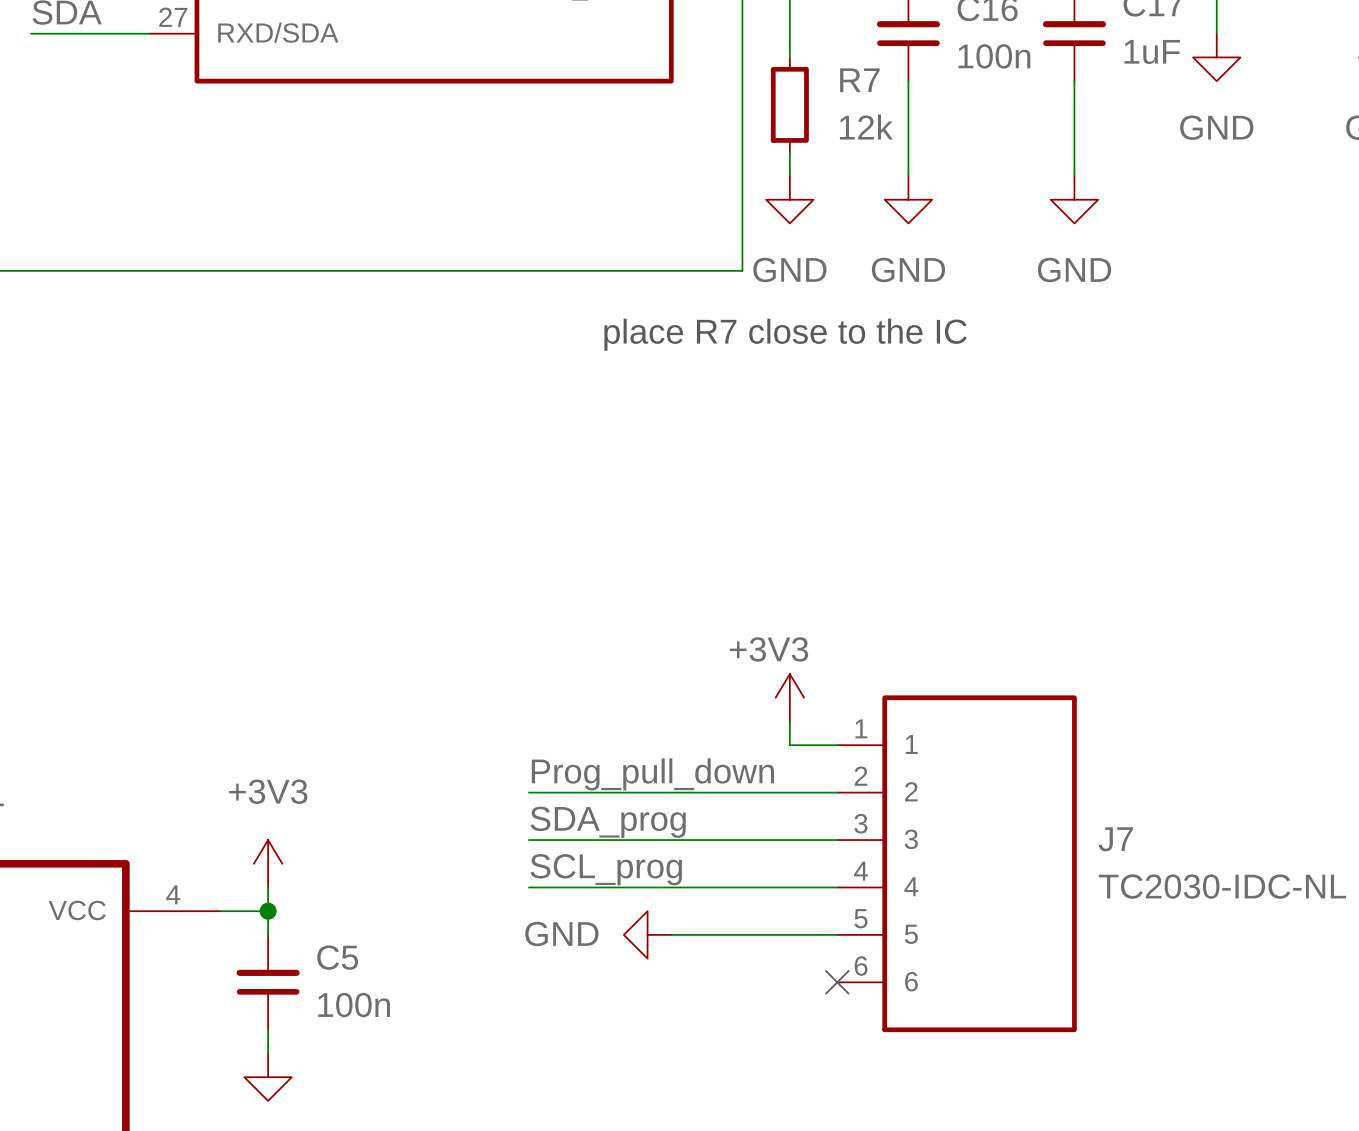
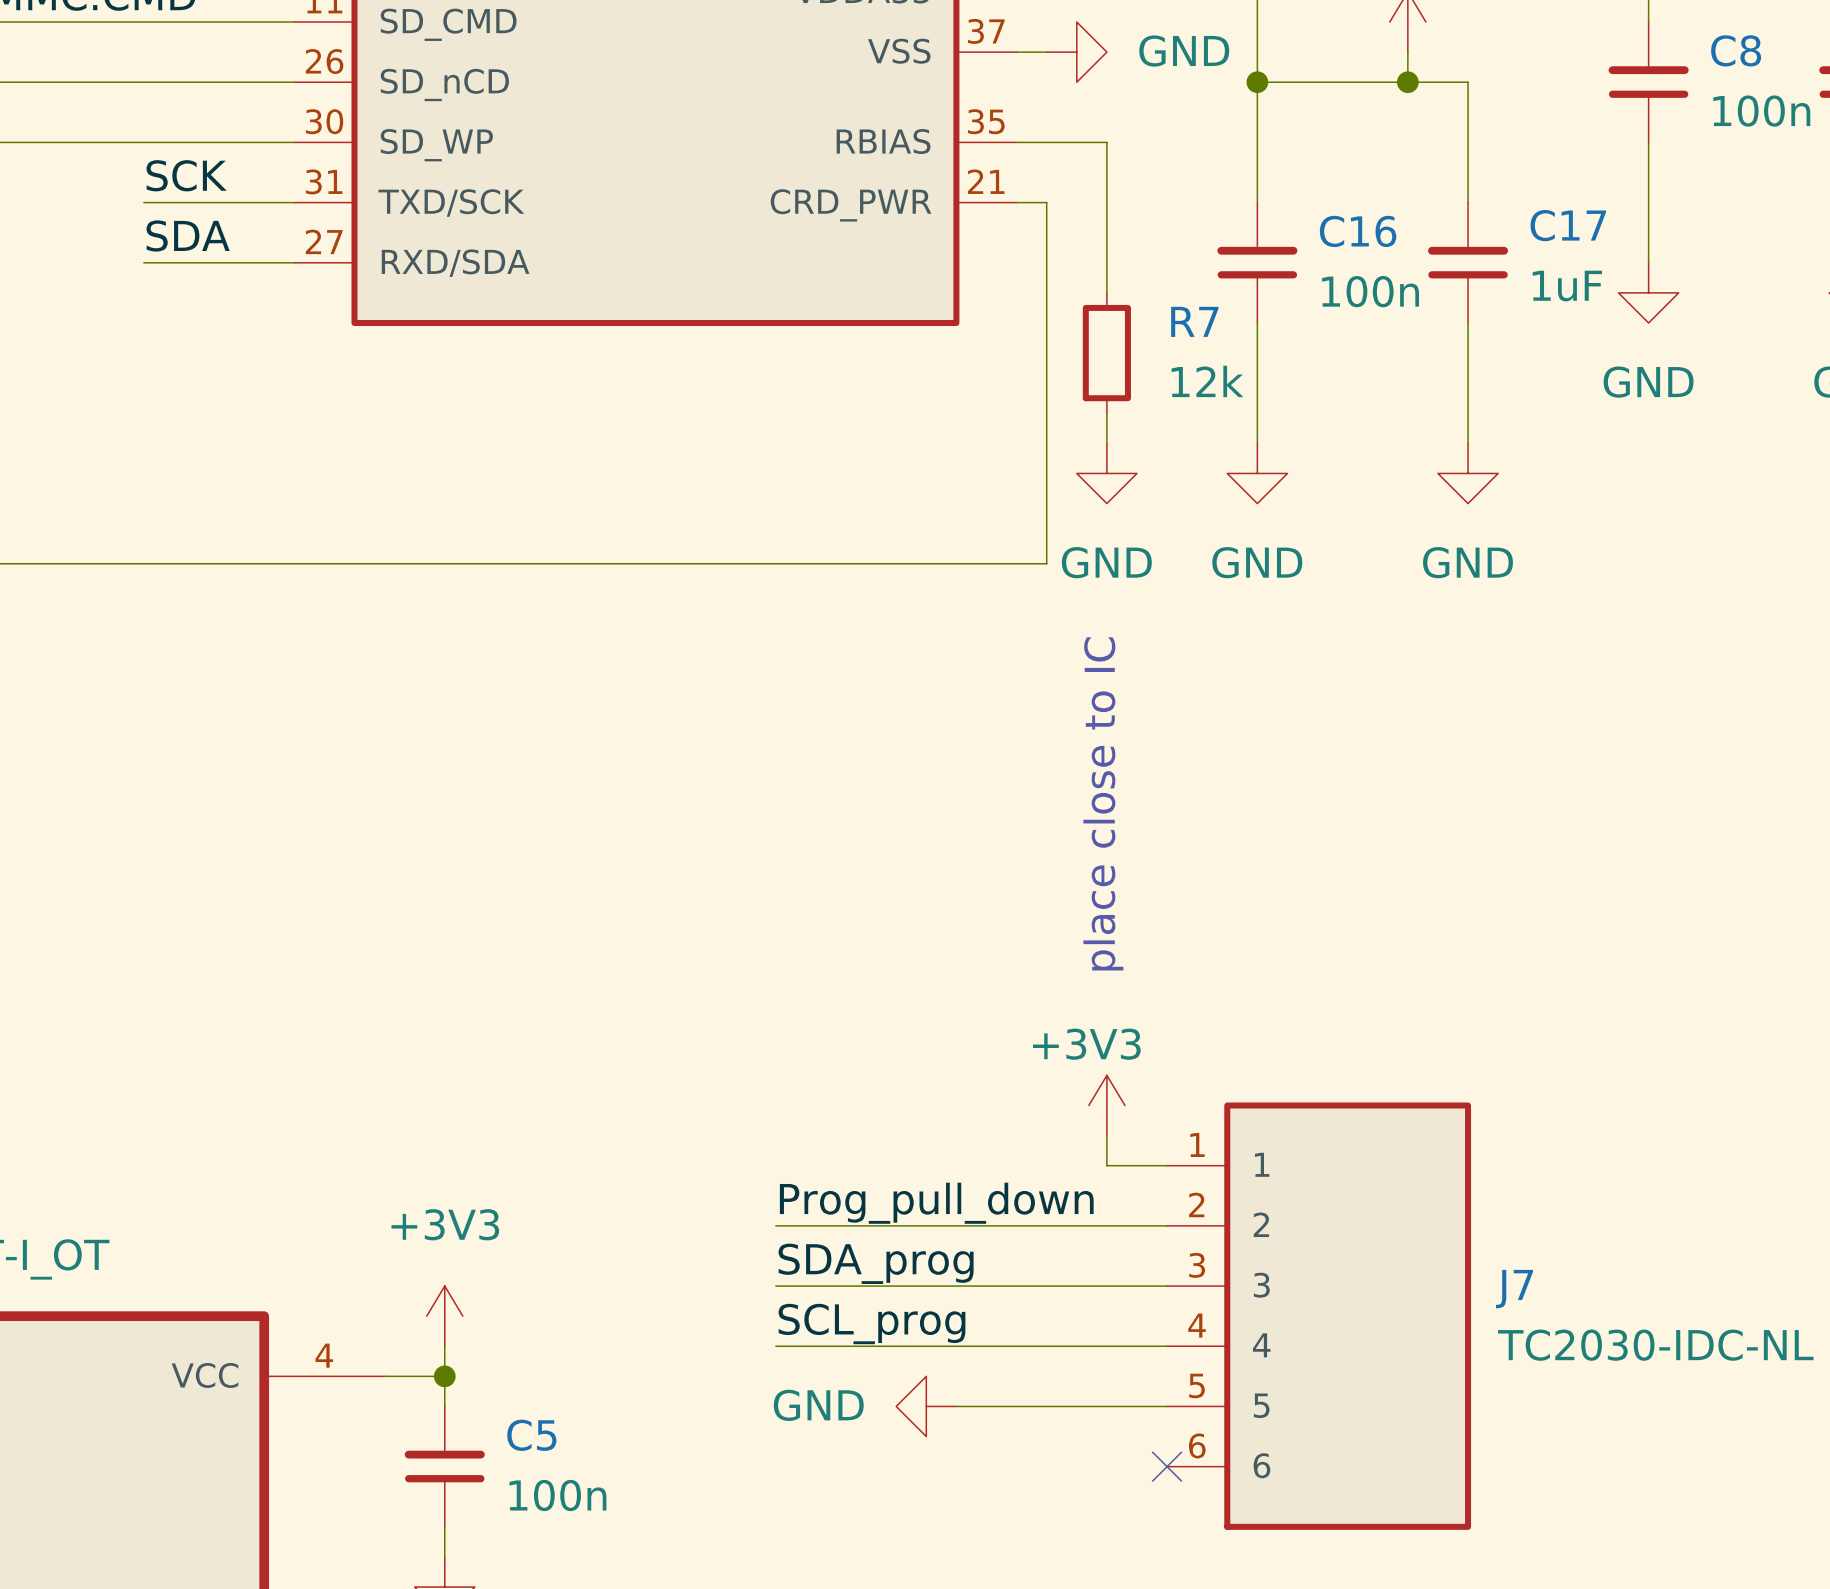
text: place R7 close to the IC (785, 334) -> place close to IC (1103, 803)

